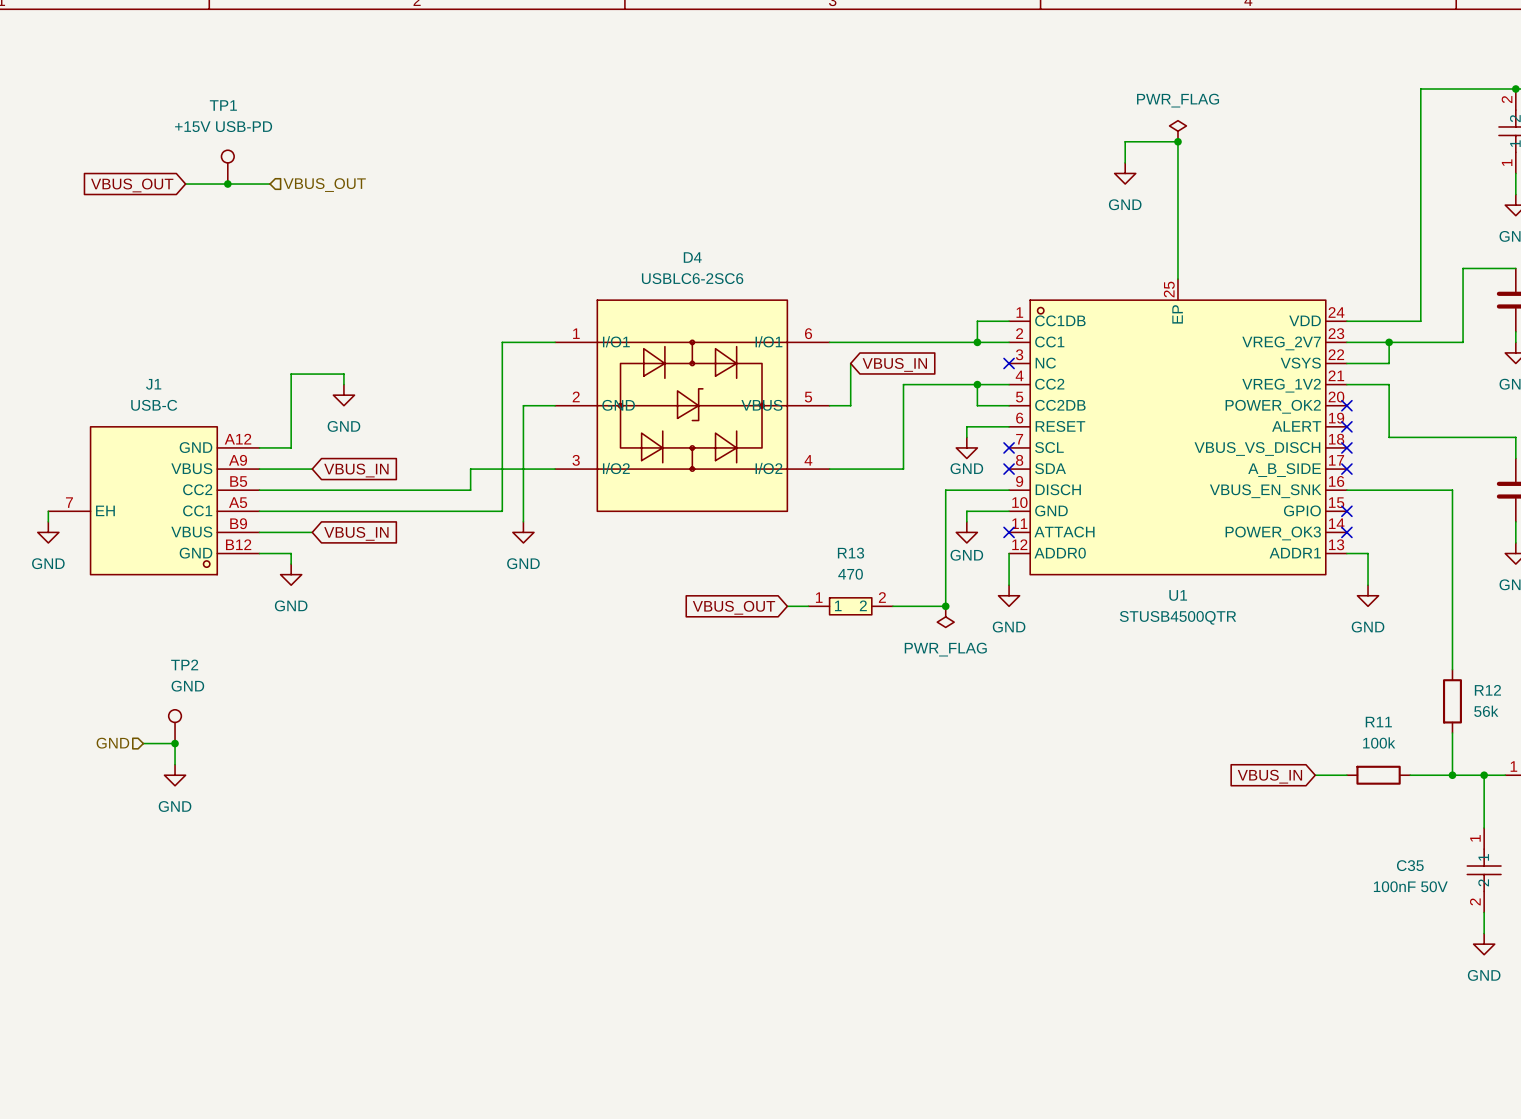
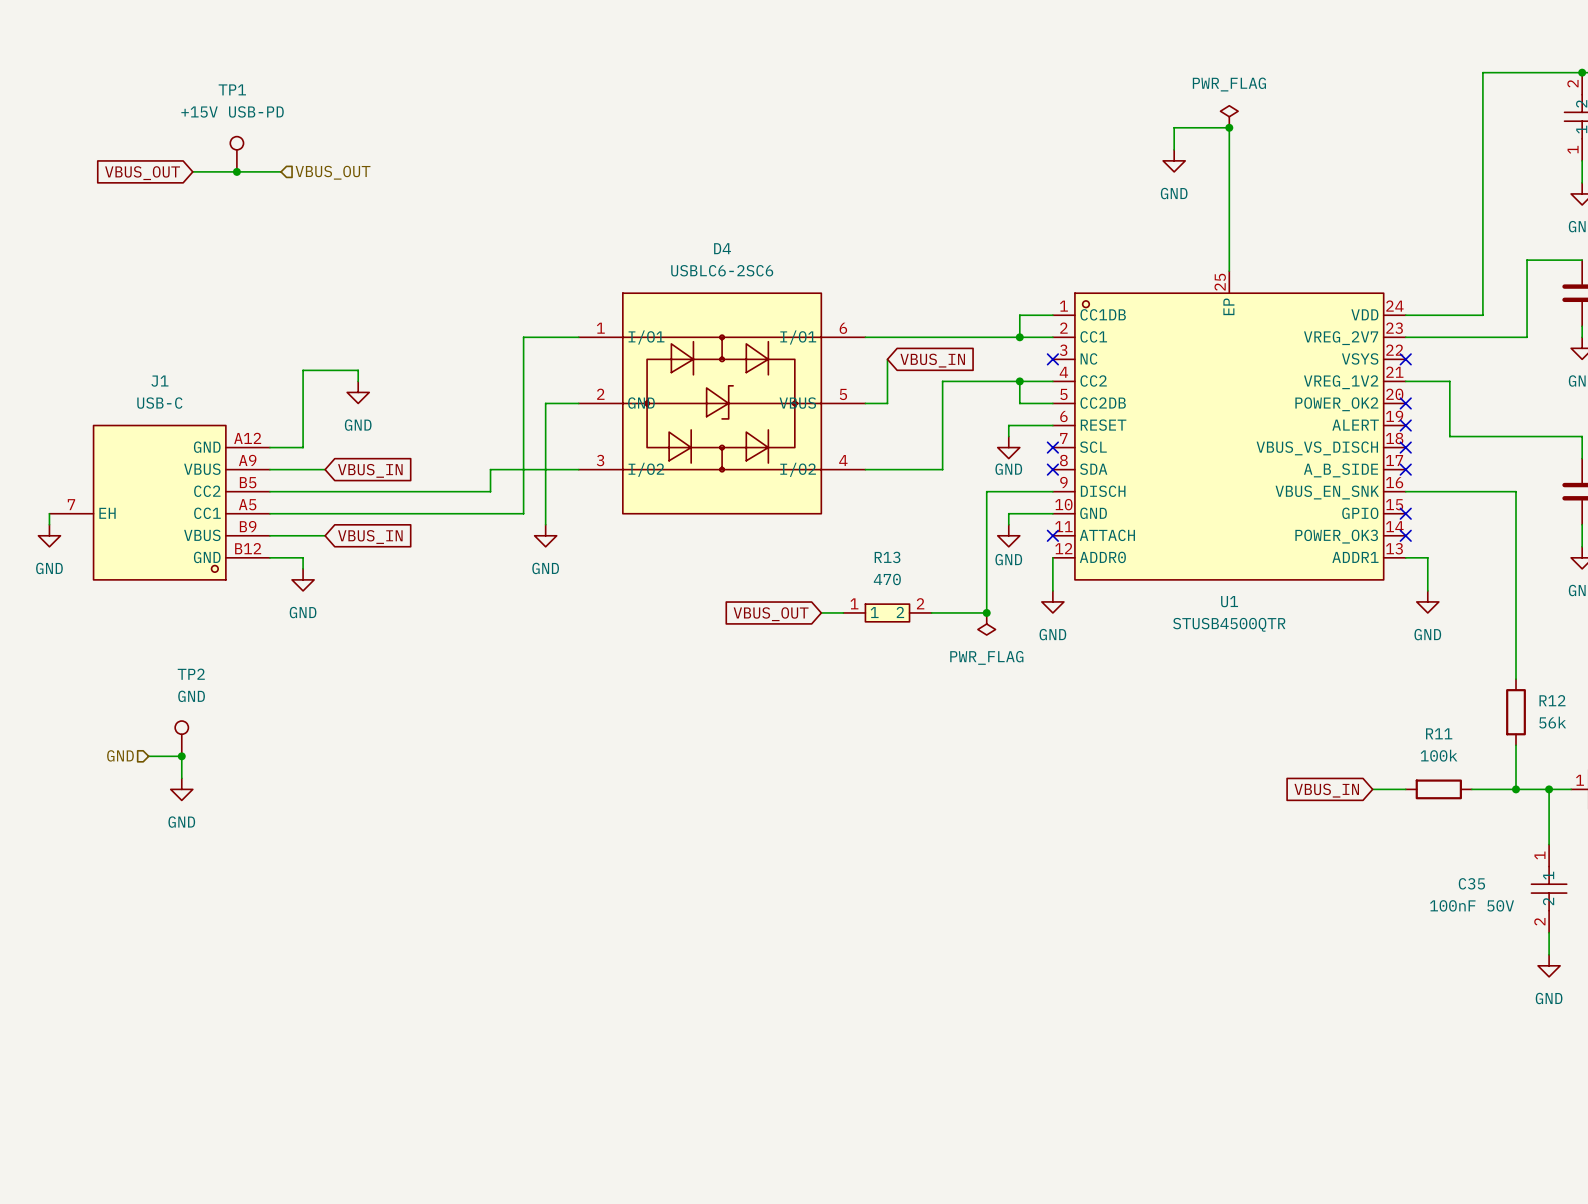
wire: (1389, 342) (1389, 363) (1346, 363) -> none
junction: (1389, 342) -> none
no-connect mark: none -> (1405, 359)

